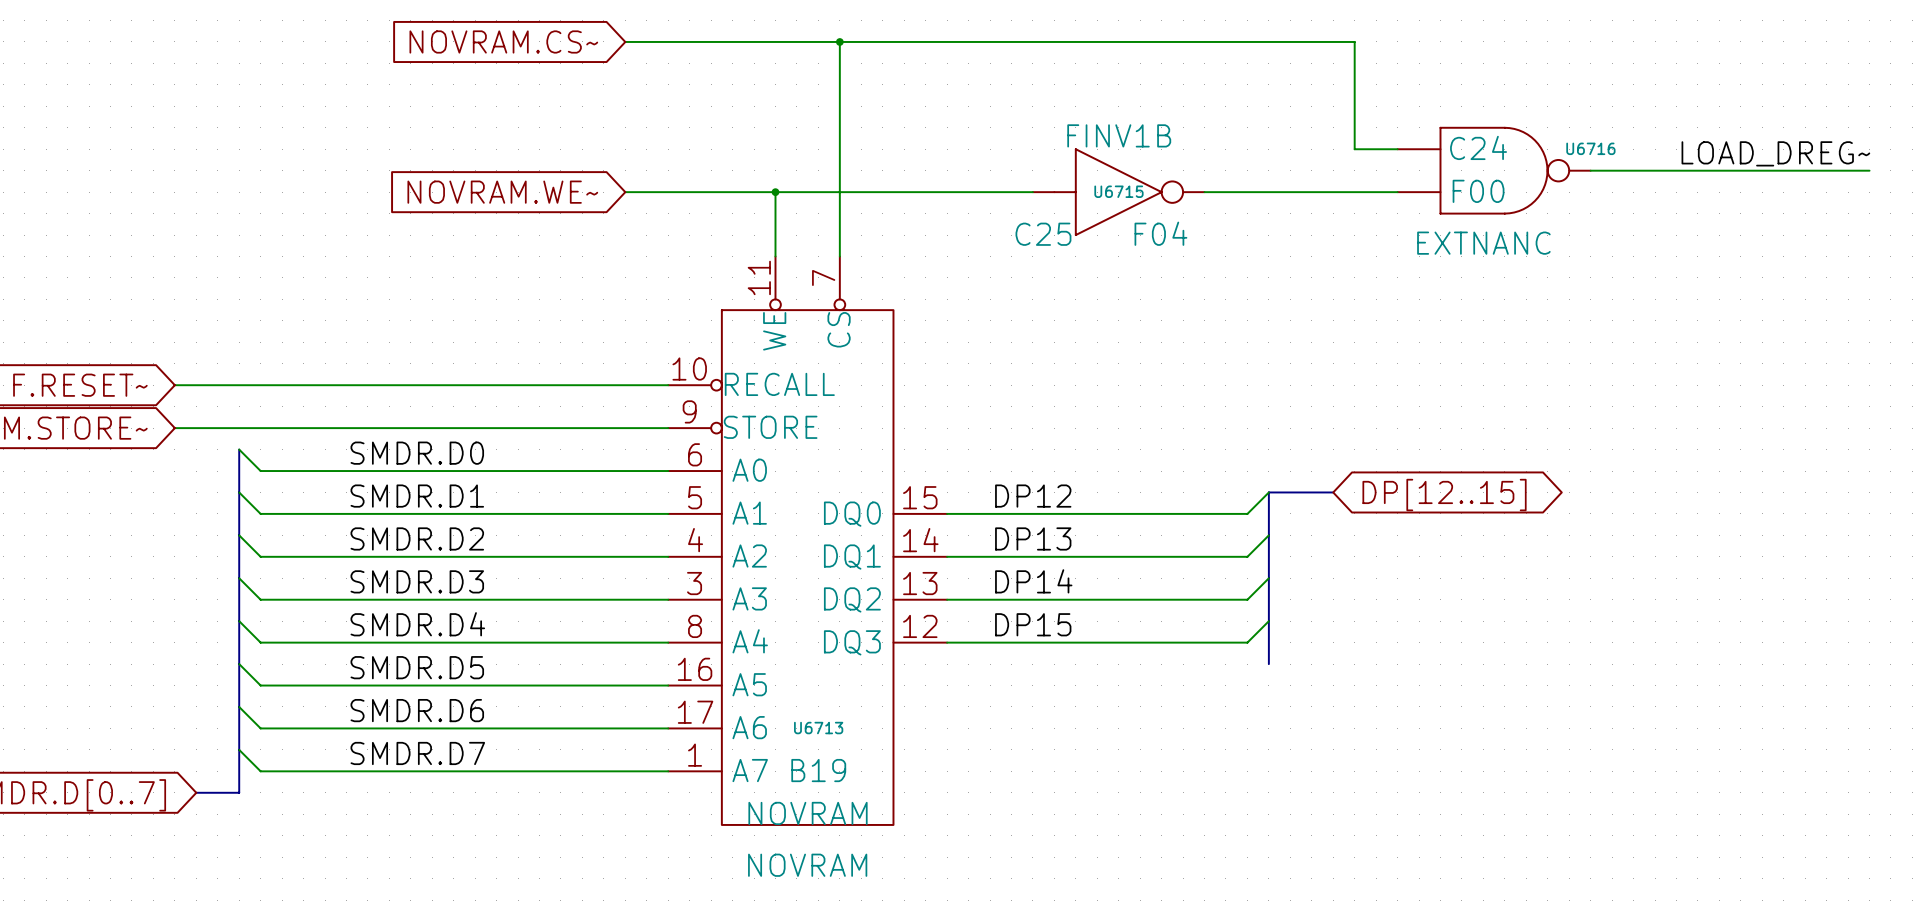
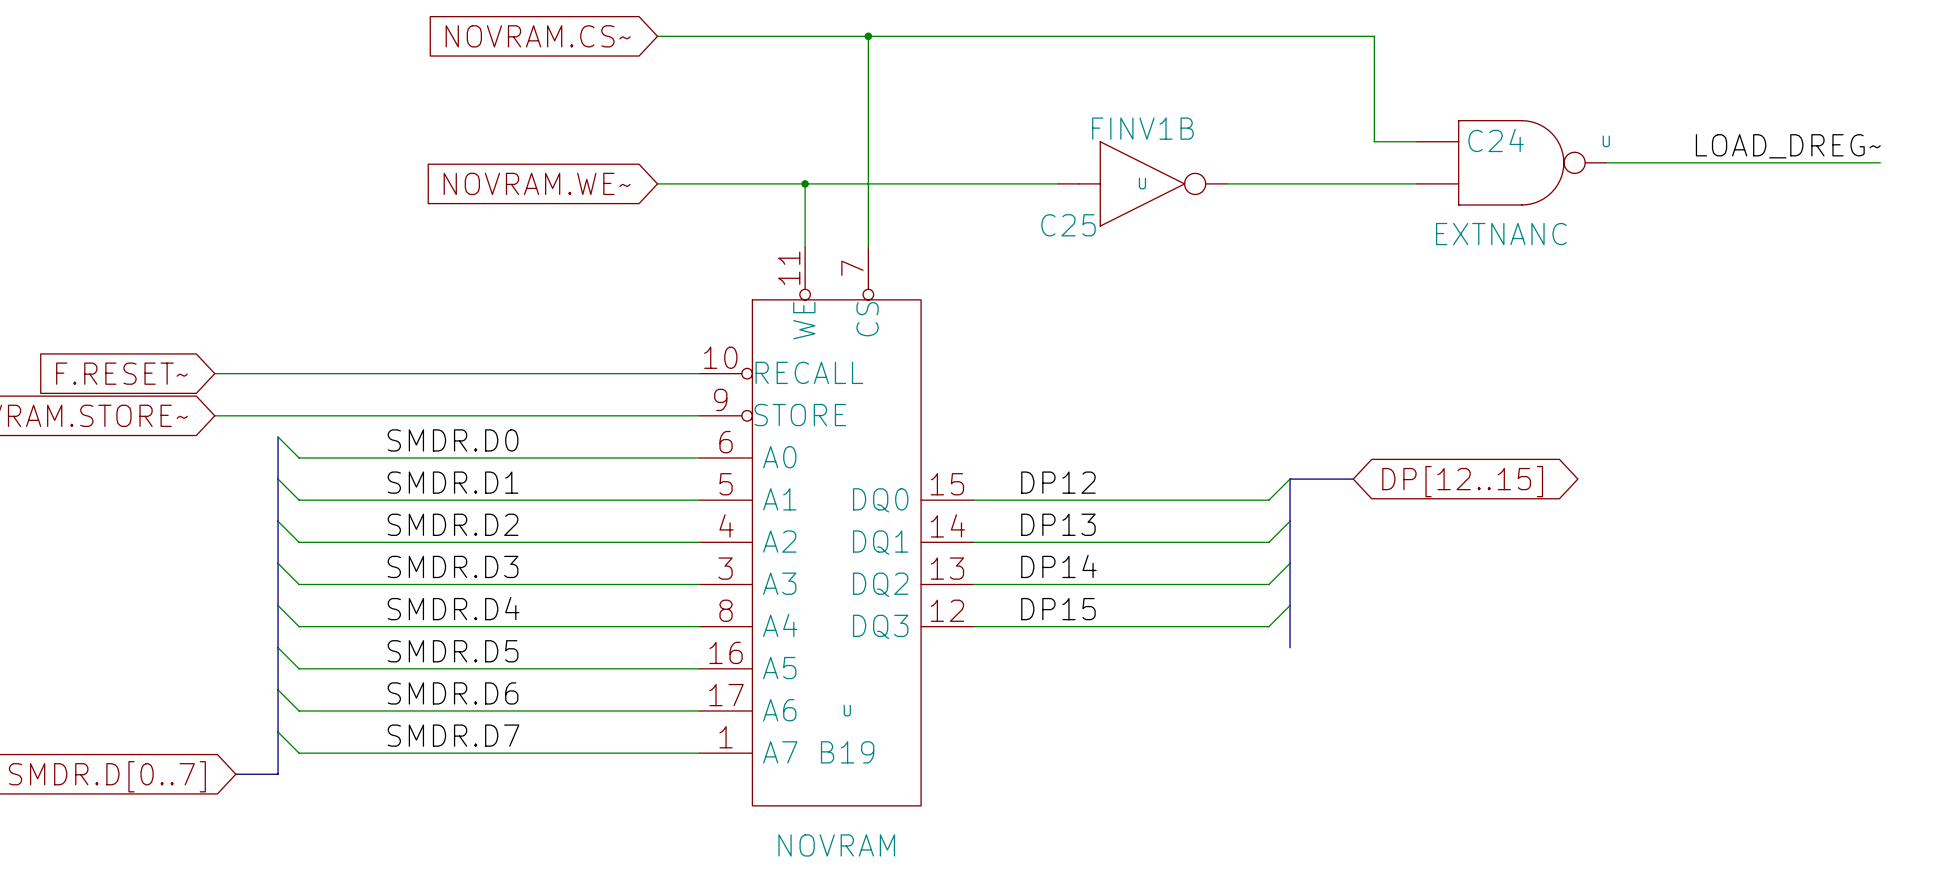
U6716 name: U6716 (1590, 148) -> U (1606, 141)
U6715 name: U6715 (1118, 191) -> U (1142, 183)
U6716 value: F00 (1478, 191) -> none
U6715 value: F04 (1160, 233) -> none
U6713 name: U6713 (818, 728) -> U (847, 710)
U6713 value: NOVRAM (808, 813) -> none

